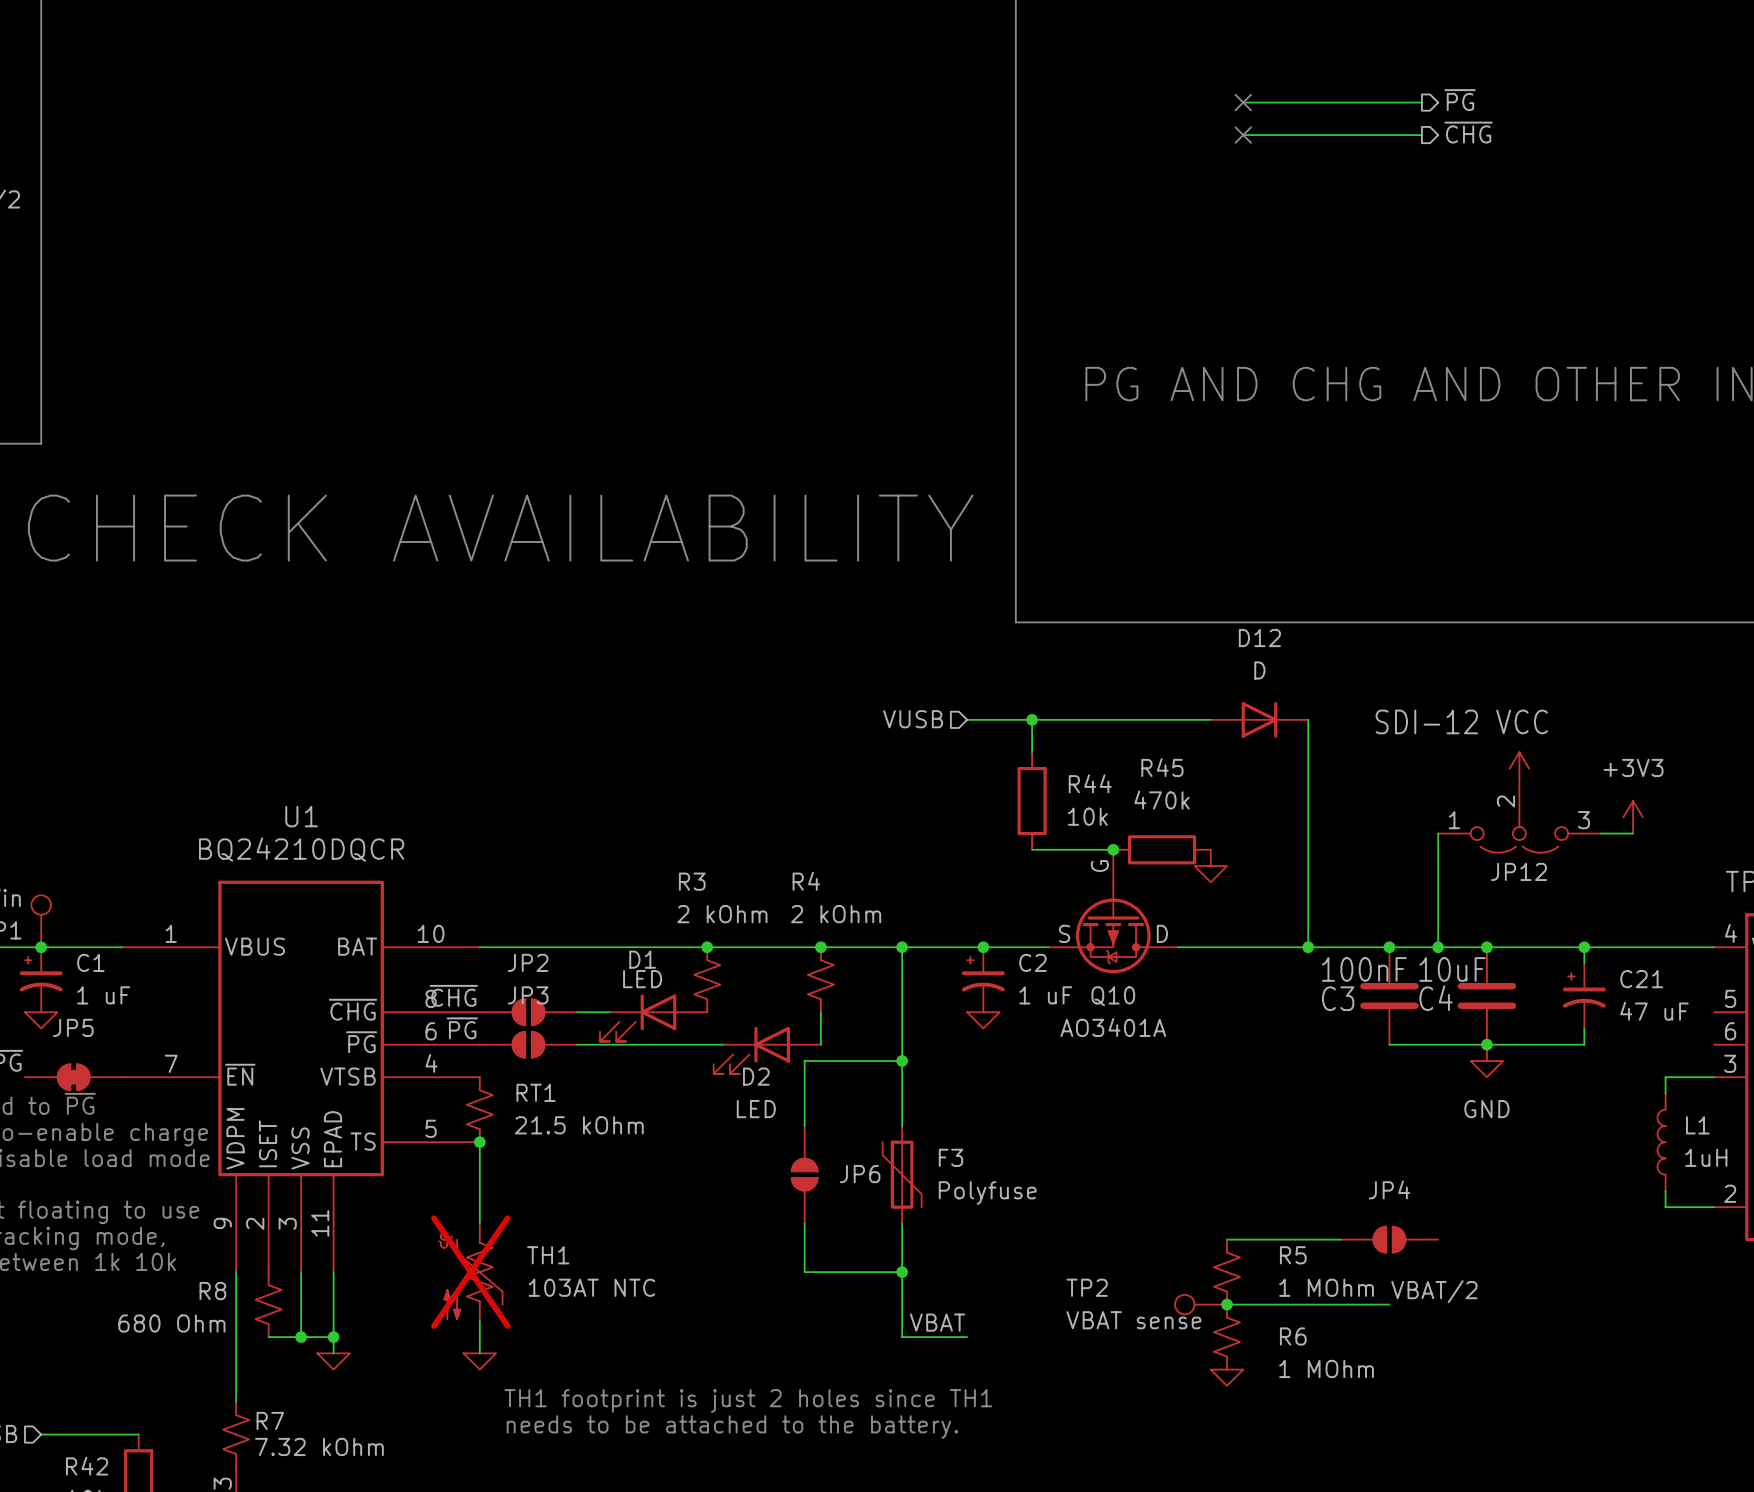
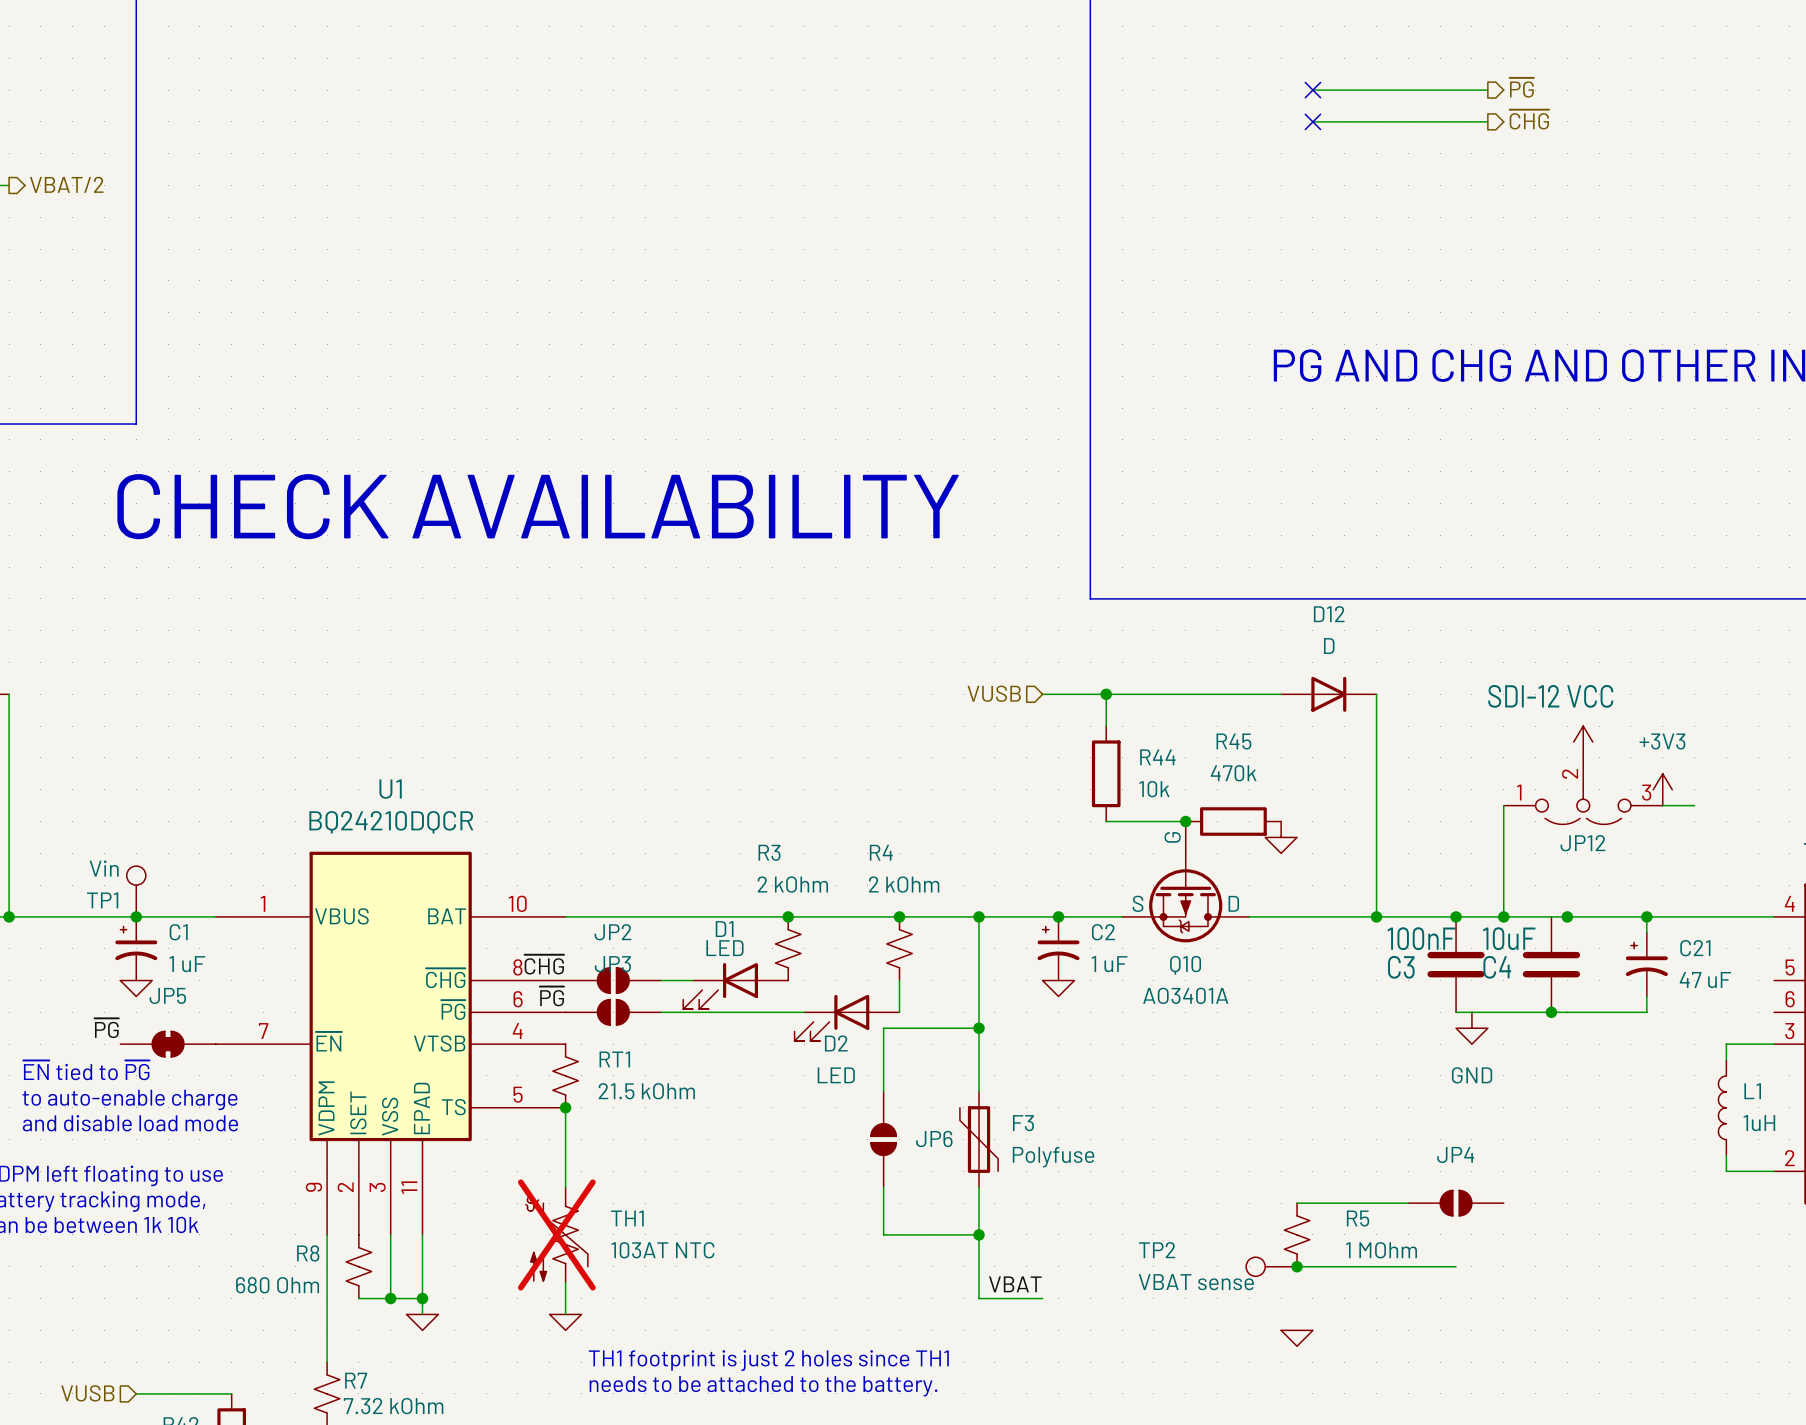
power symbol position: +3V3 (1633, 817) -> +3V3 (1662, 789)
junction position: (1486, 947) -> (1567, 916)
power symbol position: GND (1486, 1060) -> GND (1471, 1028)
label: VBAT/2 (1434, 1291) -> none
R6: 1 MOhm (1227, 1337) -> none

